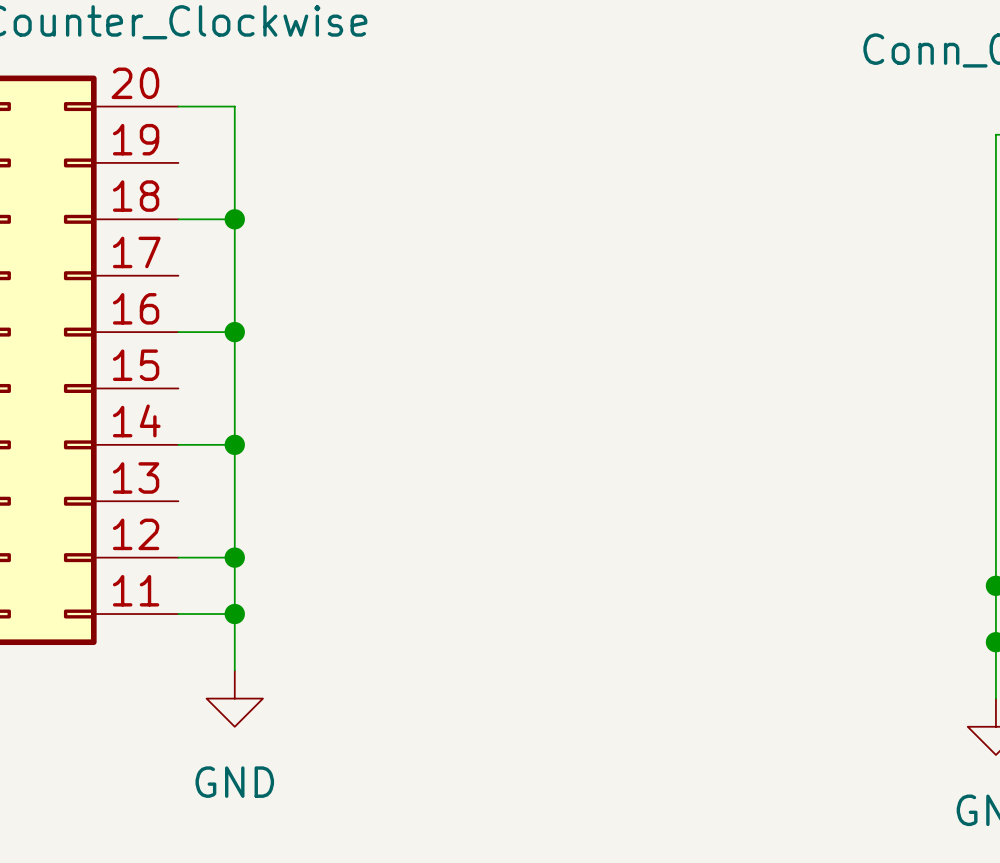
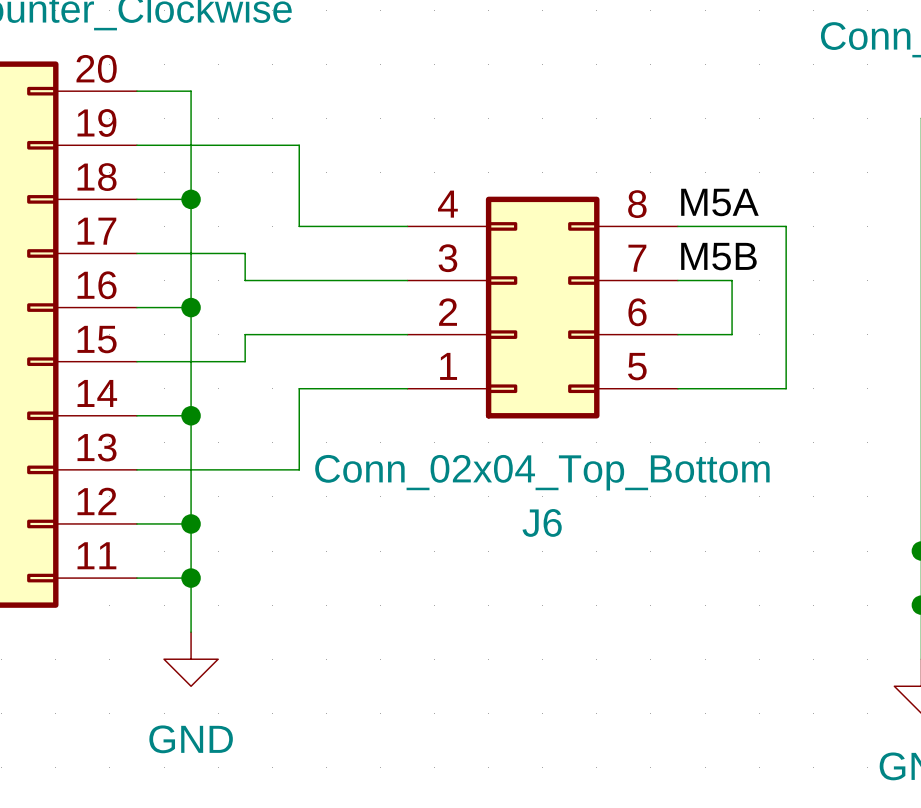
wire: none -> (136, 145) (299, 145) (299, 226) (407, 226)
label: none -> M5A (719, 202)
wire: none -> (677, 226) (786, 226) (786, 388) (677, 388)
wire: none -> (136, 253) (245, 253) (245, 280) (407, 280)
label: none -> M5B (718, 256)
wire: none -> (677, 280) (732, 280) (732, 334) (677, 334)
J6: none -> Conn_02x04_Top_Bottom (542, 307)
wire: none -> (407, 334) (245, 334) (245, 361) (136, 361)
wire: none -> (407, 388) (299, 388) (299, 469) (136, 469)

